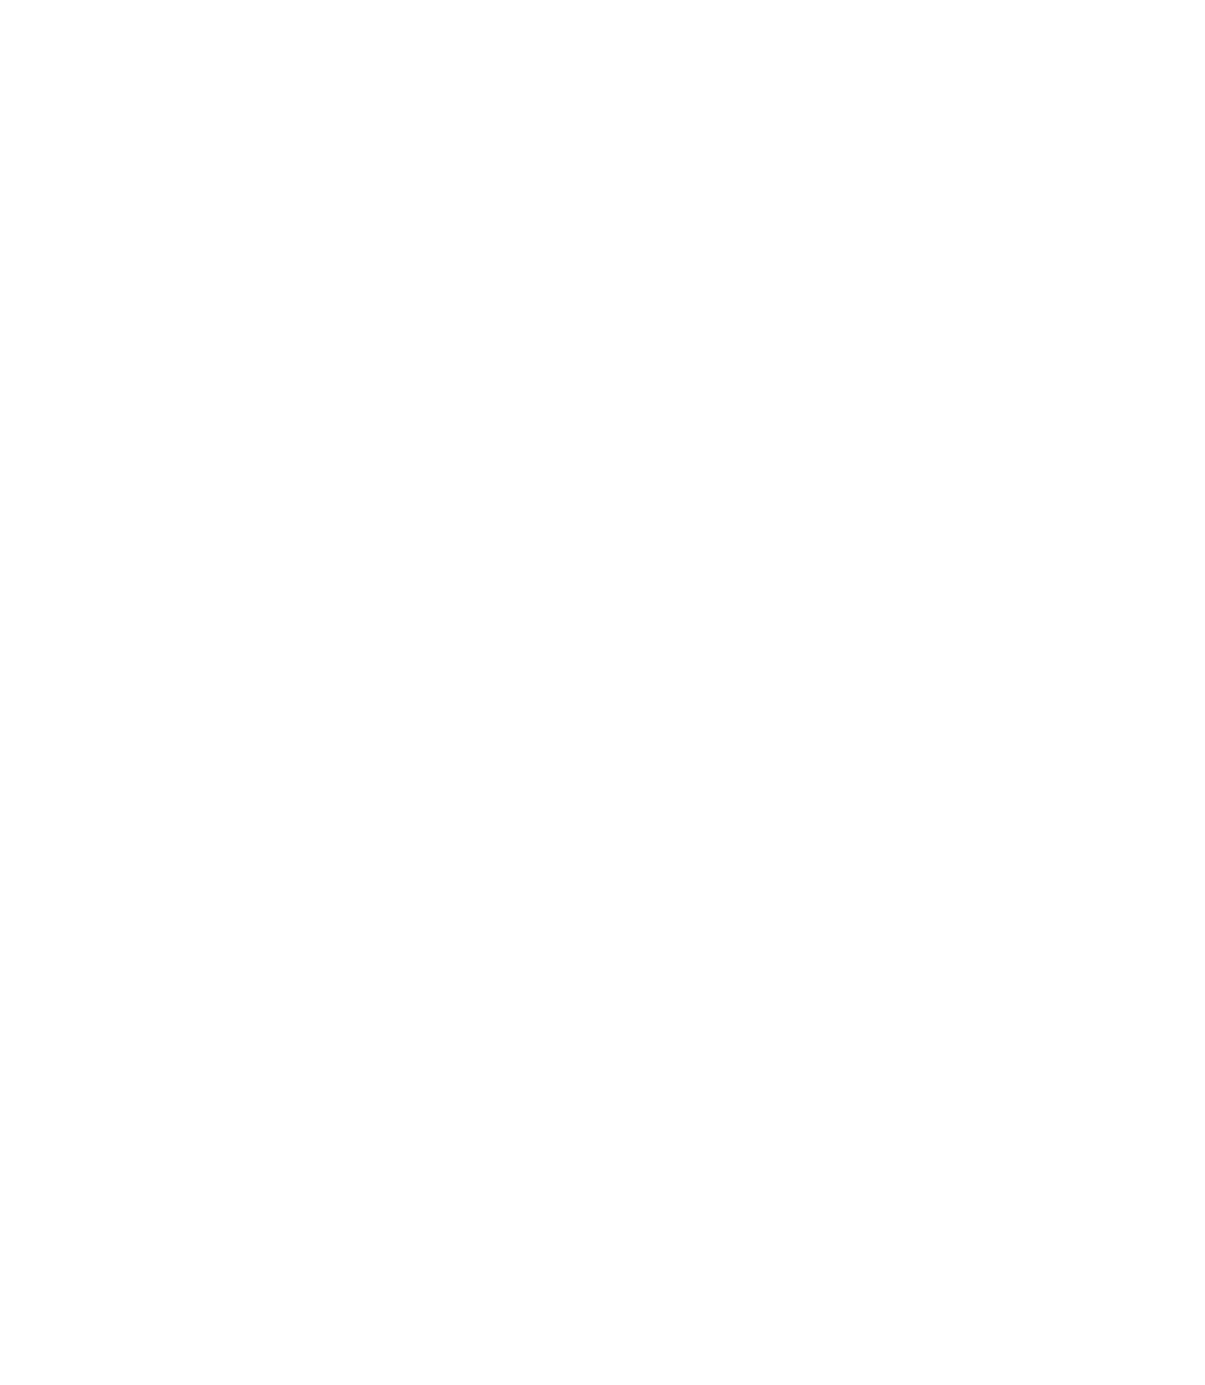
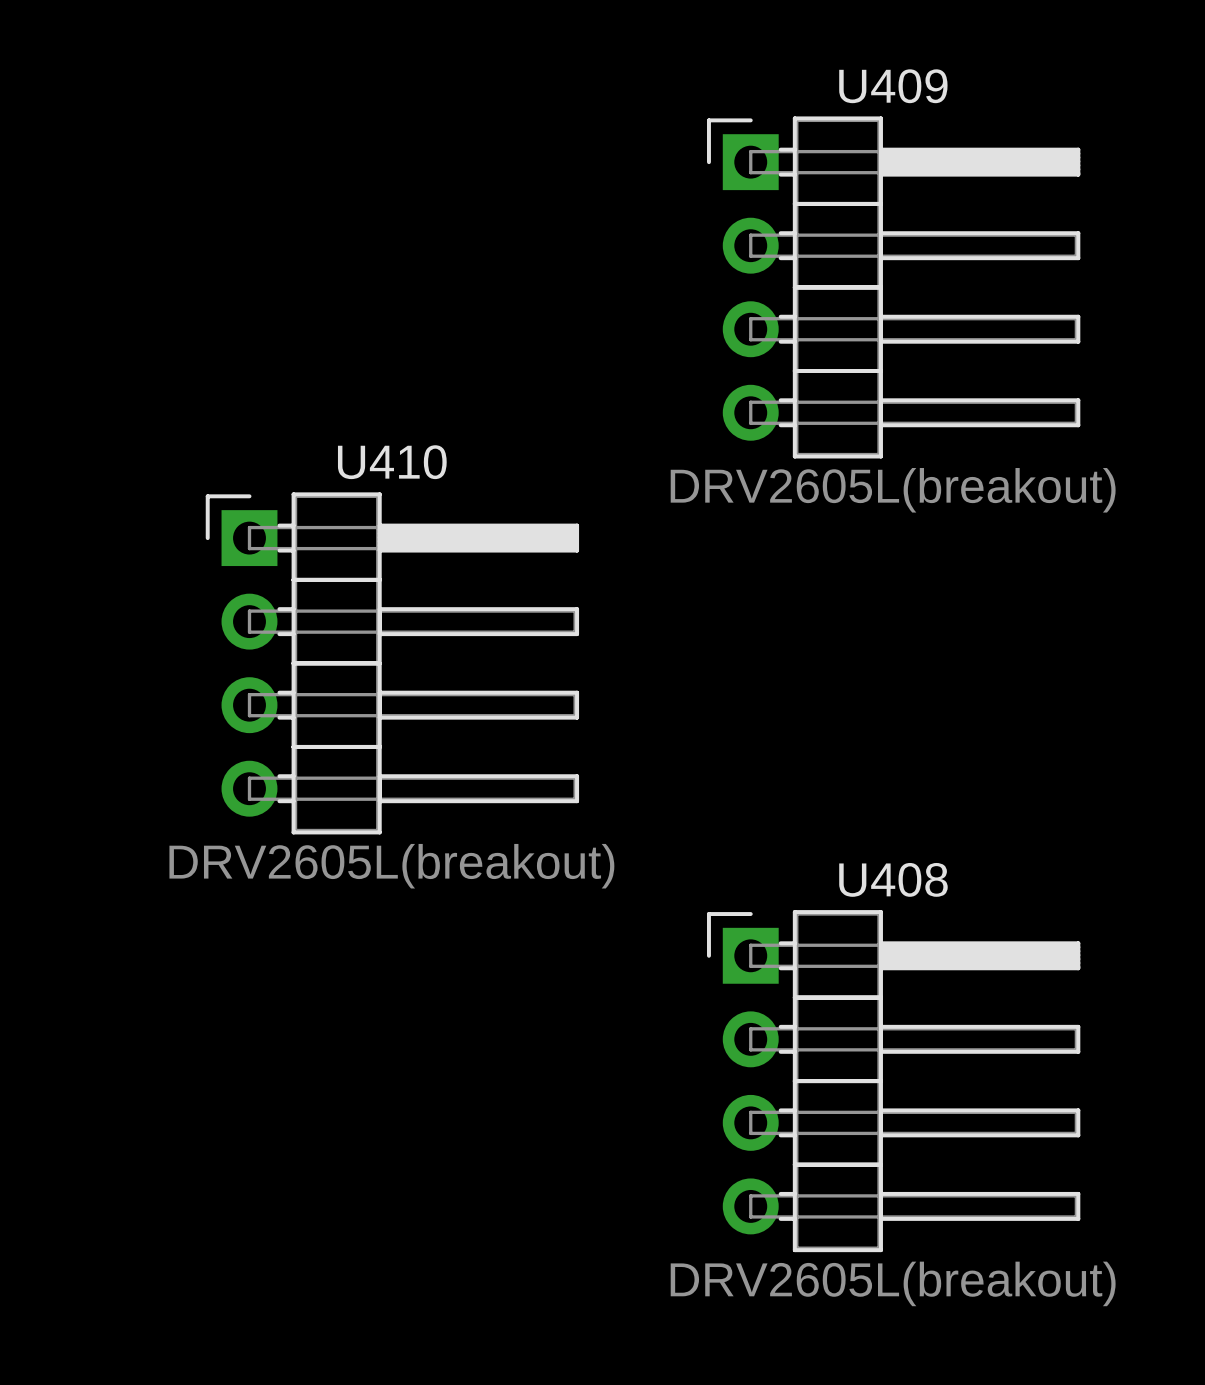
U409: none -> DRV2605L(breakout) (893, 287)
U410: none -> DRV2605L(breakout) (392, 663)
U408: none -> DRV2605L(breakout) (893, 1081)

